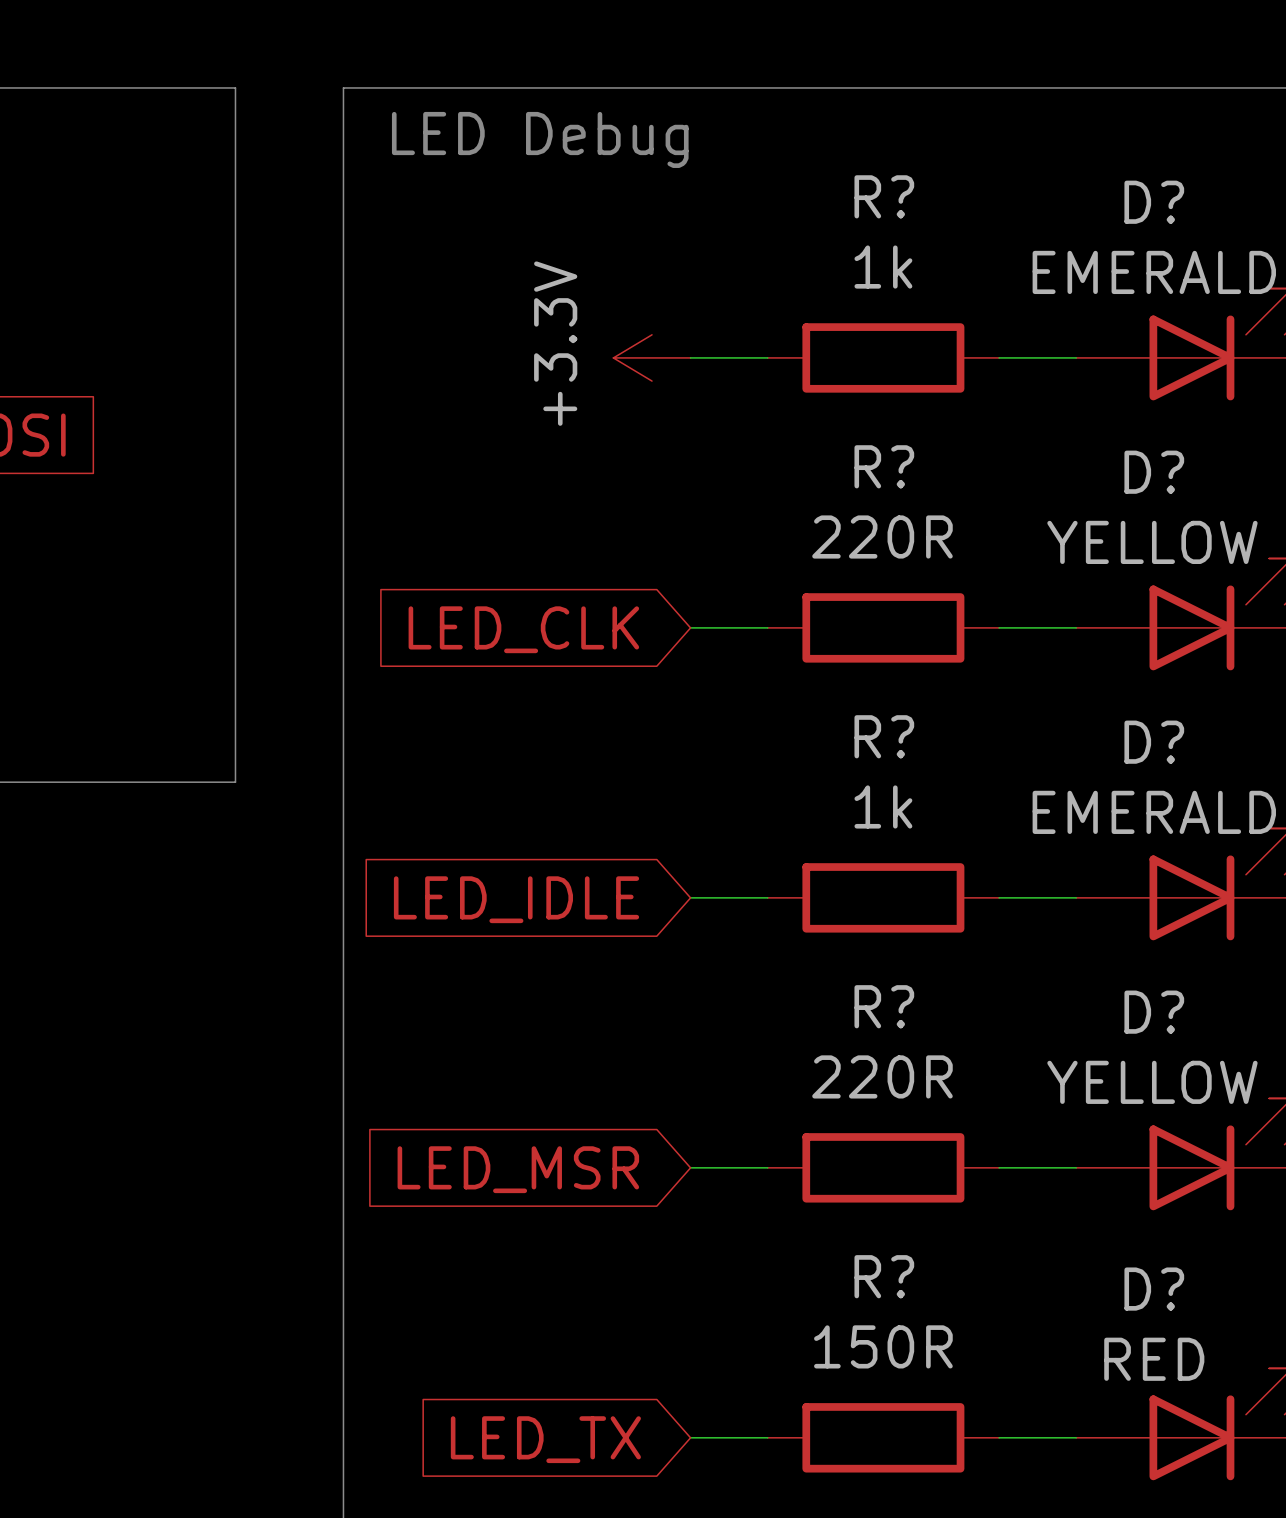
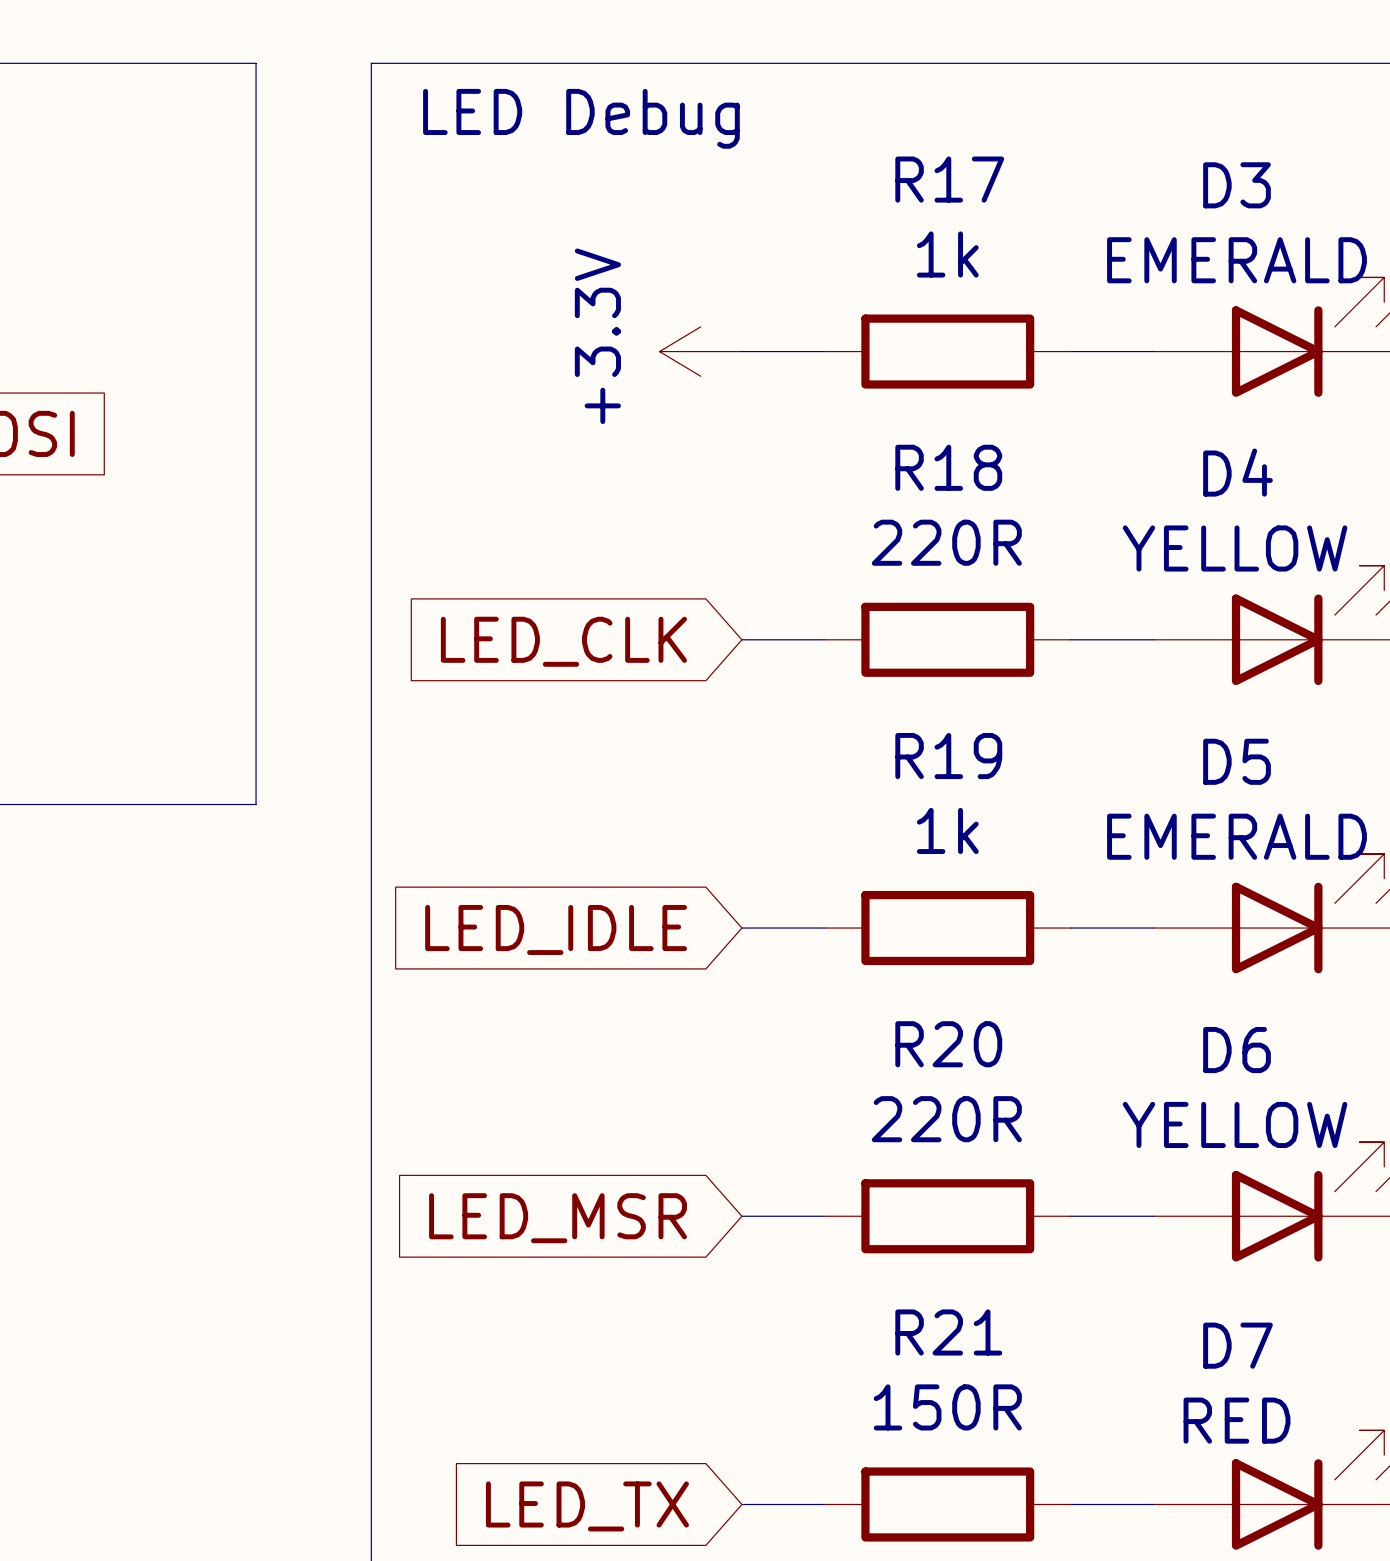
R? name: R? (884, 196) -> R17 (949, 179)
D? name: D? (1154, 202) -> D3 (1237, 185)
R? name: R? (884, 466) -> R18 (948, 467)
D? name: D? (1154, 472) -> D4 (1237, 472)
R? name: R? (884, 736) -> R19 (948, 756)
D? name: D? (1154, 742) -> D5 (1237, 761)
R? name: R? (884, 1006) -> R20 (948, 1044)
D? name: D? (1154, 1012) -> D6 (1237, 1050)
R? name: R? (884, 1276) -> R21 (948, 1332)
D? name: D? (1154, 1289) -> D7 (1237, 1345)

